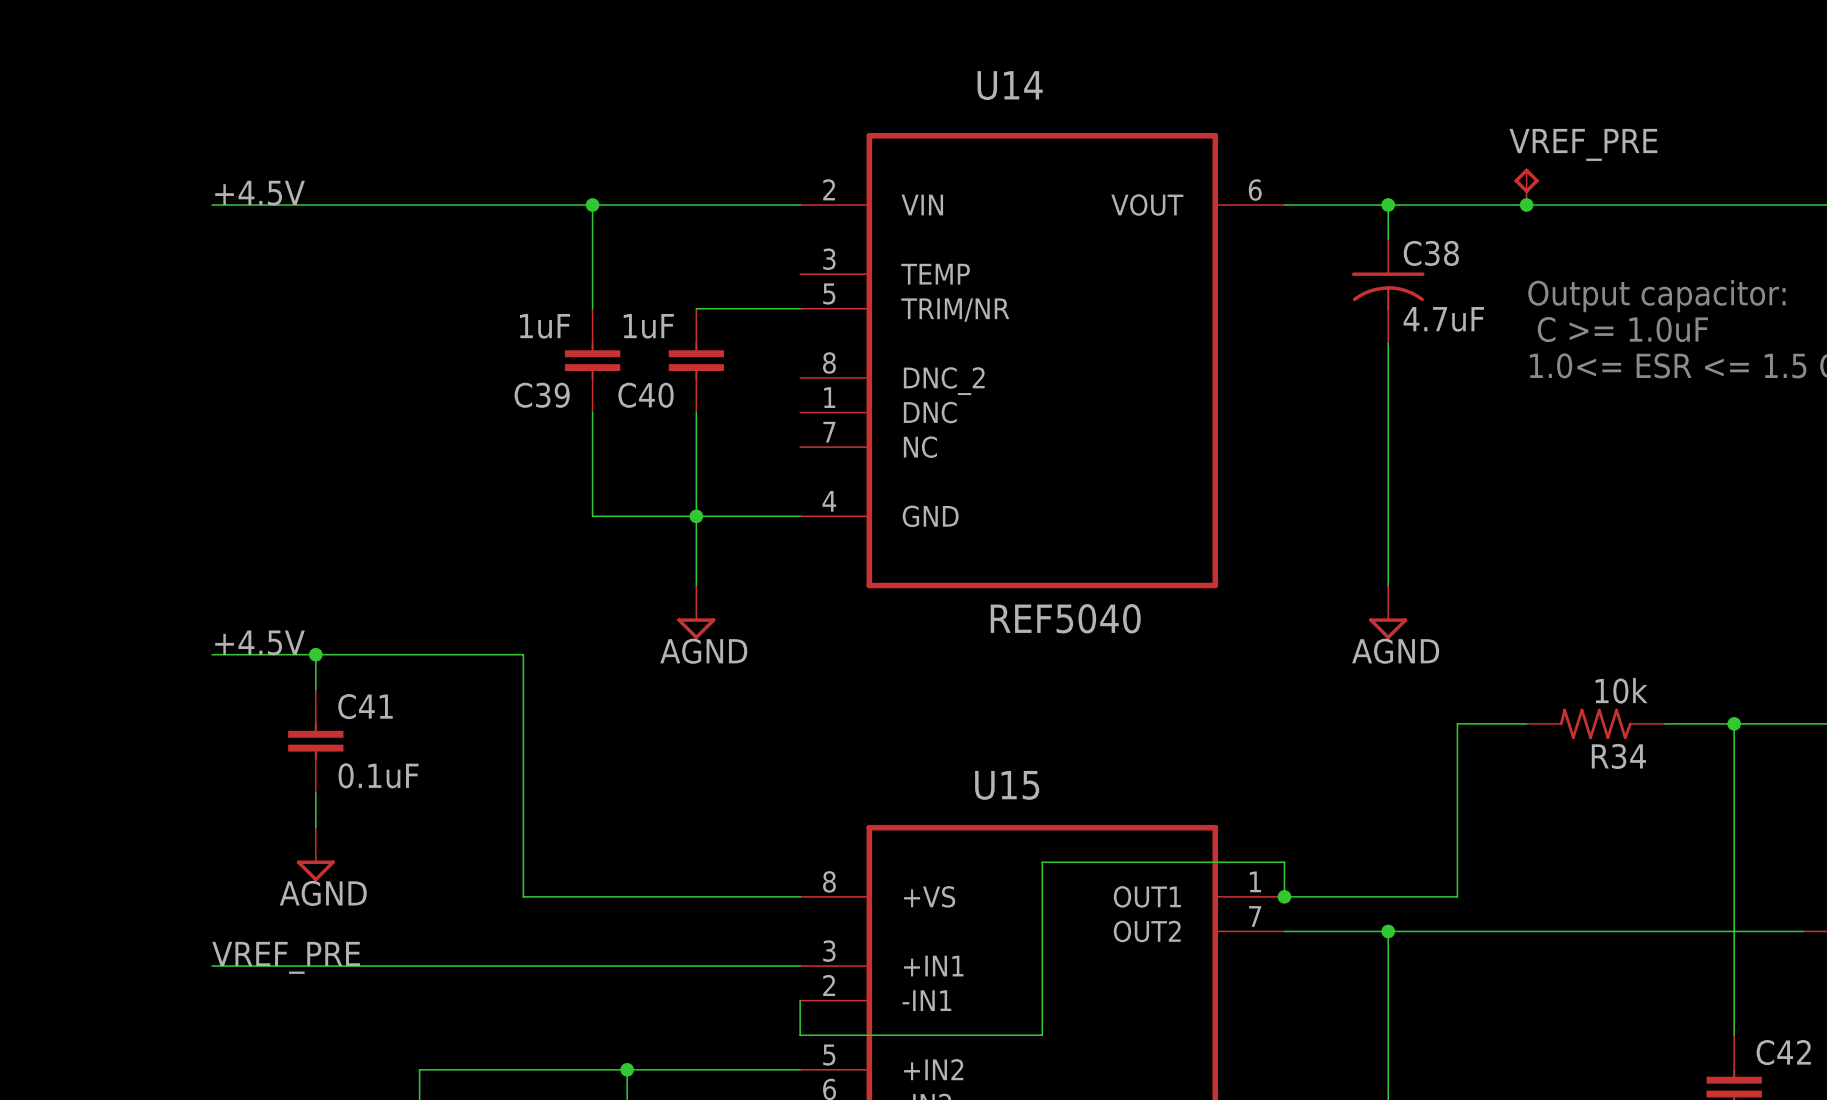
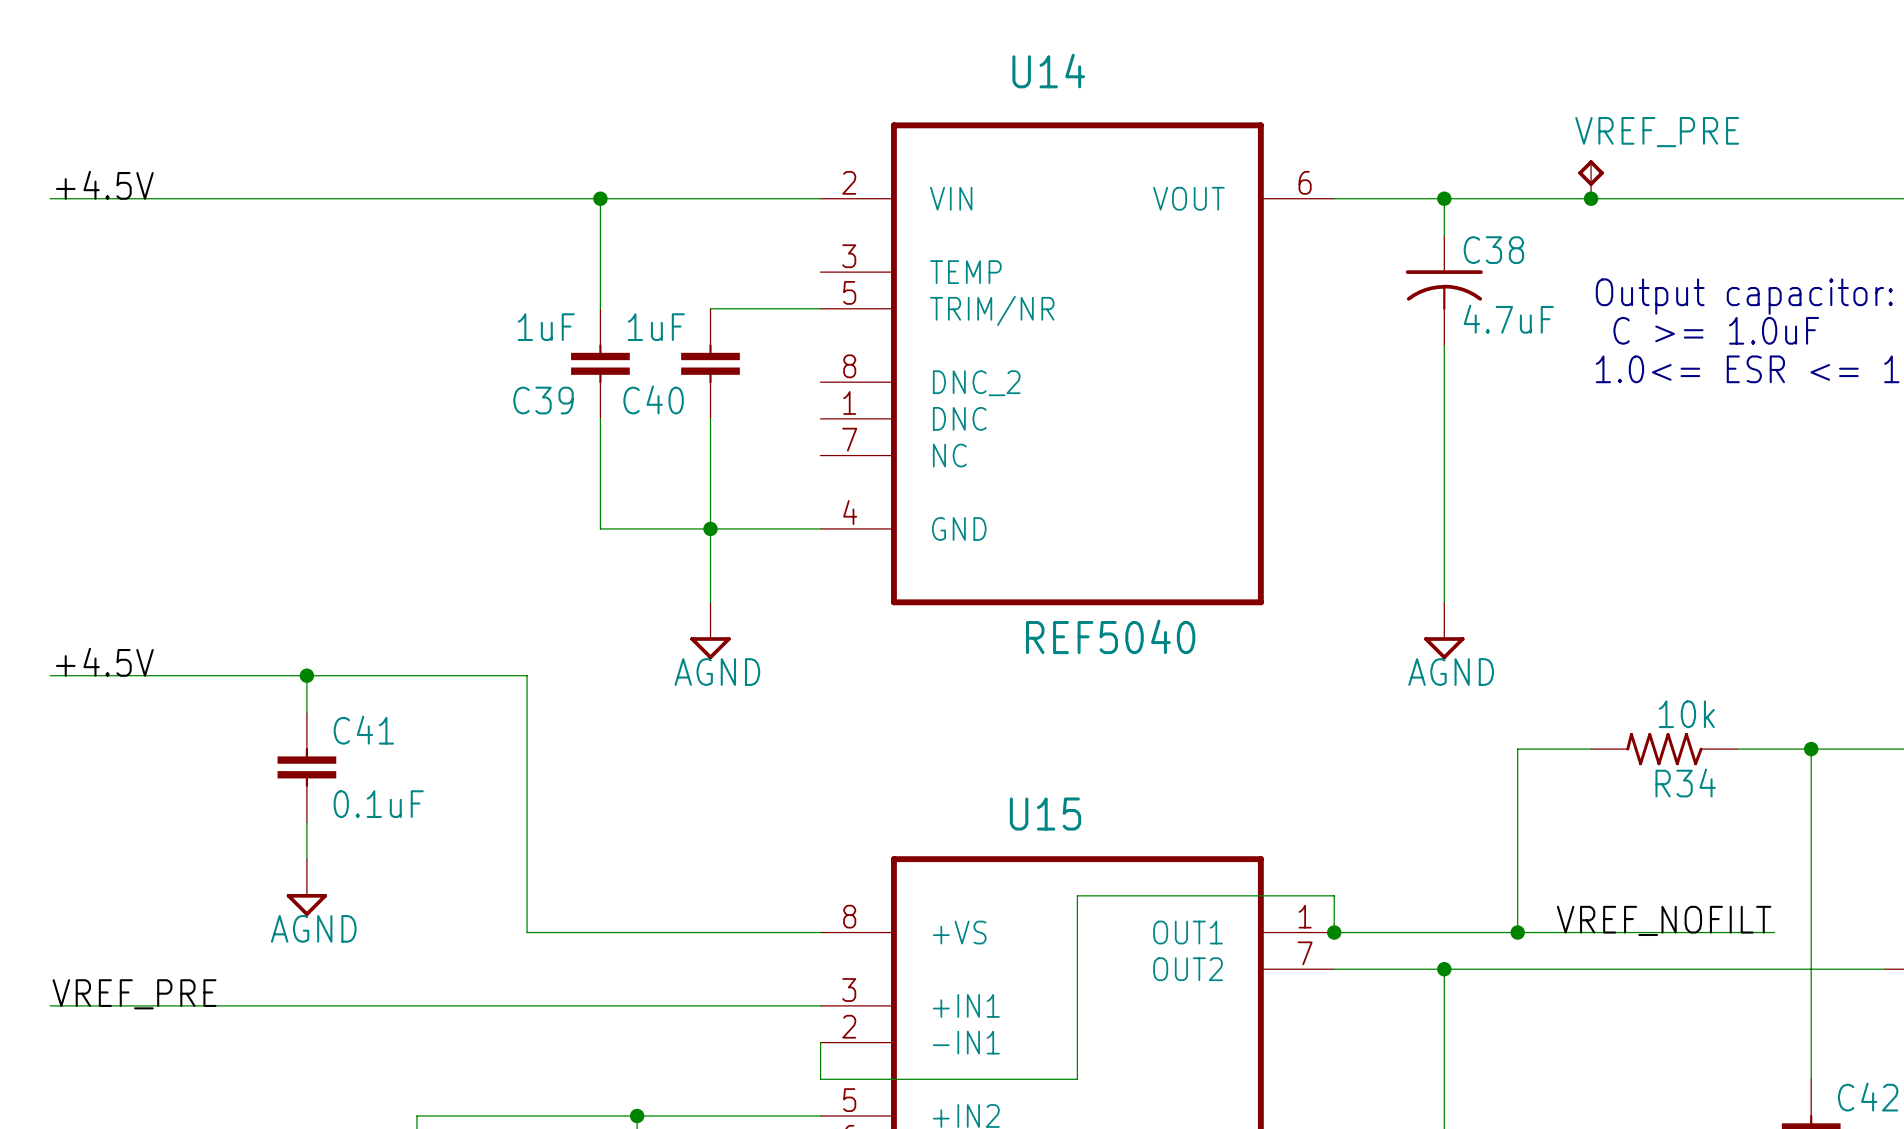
label position: +4.5V (260, 193) -> +4.5V (104, 185)
wire: none -> (50, 198) (196, 198)
label position: +4.5V (260, 642) -> +4.5V (104, 662)
wire: none -> (50, 675) (196, 675)
label: none -> VREF_NOFILT (1664, 920)
wire: none -> (1517, 932) (1774, 932)
junction: none -> (1517, 932)
label position: VREF_PRE (286, 957) -> VREF_PRE (134, 994)
wire: none -> (50, 1005) (196, 1005)

